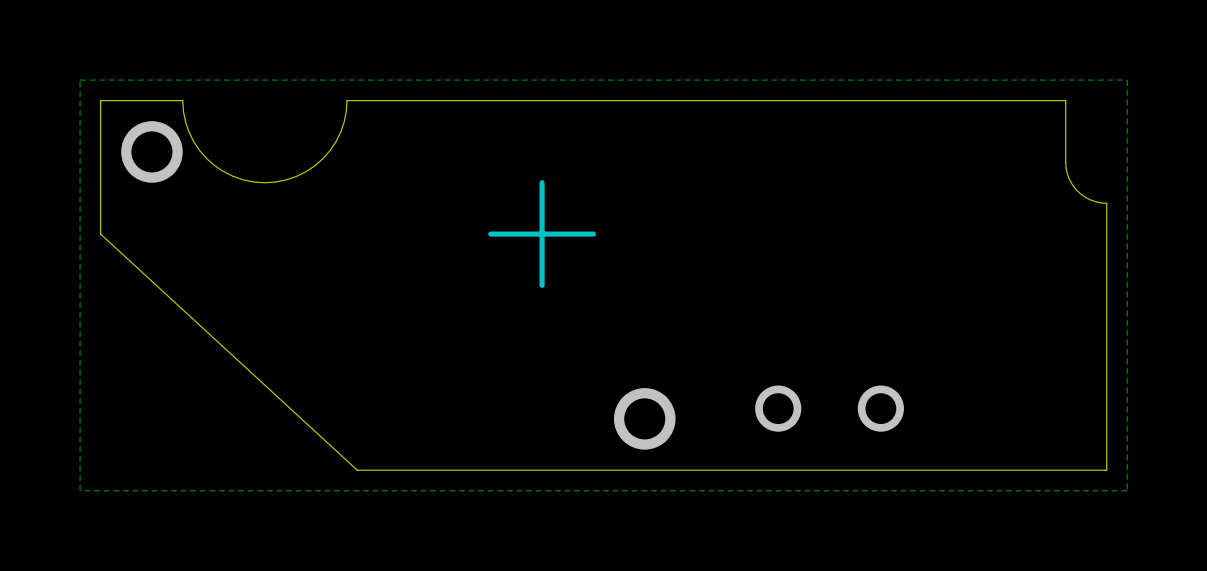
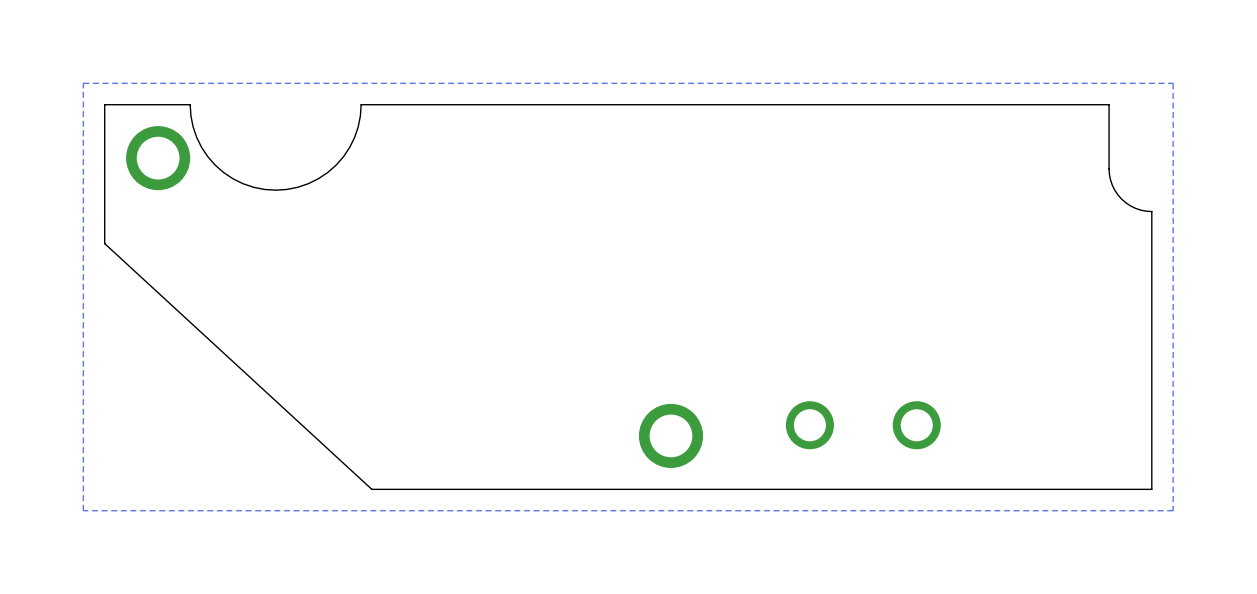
line: (542, 182) (542, 285) -> none
line: (593, 234) (490, 234) -> none

